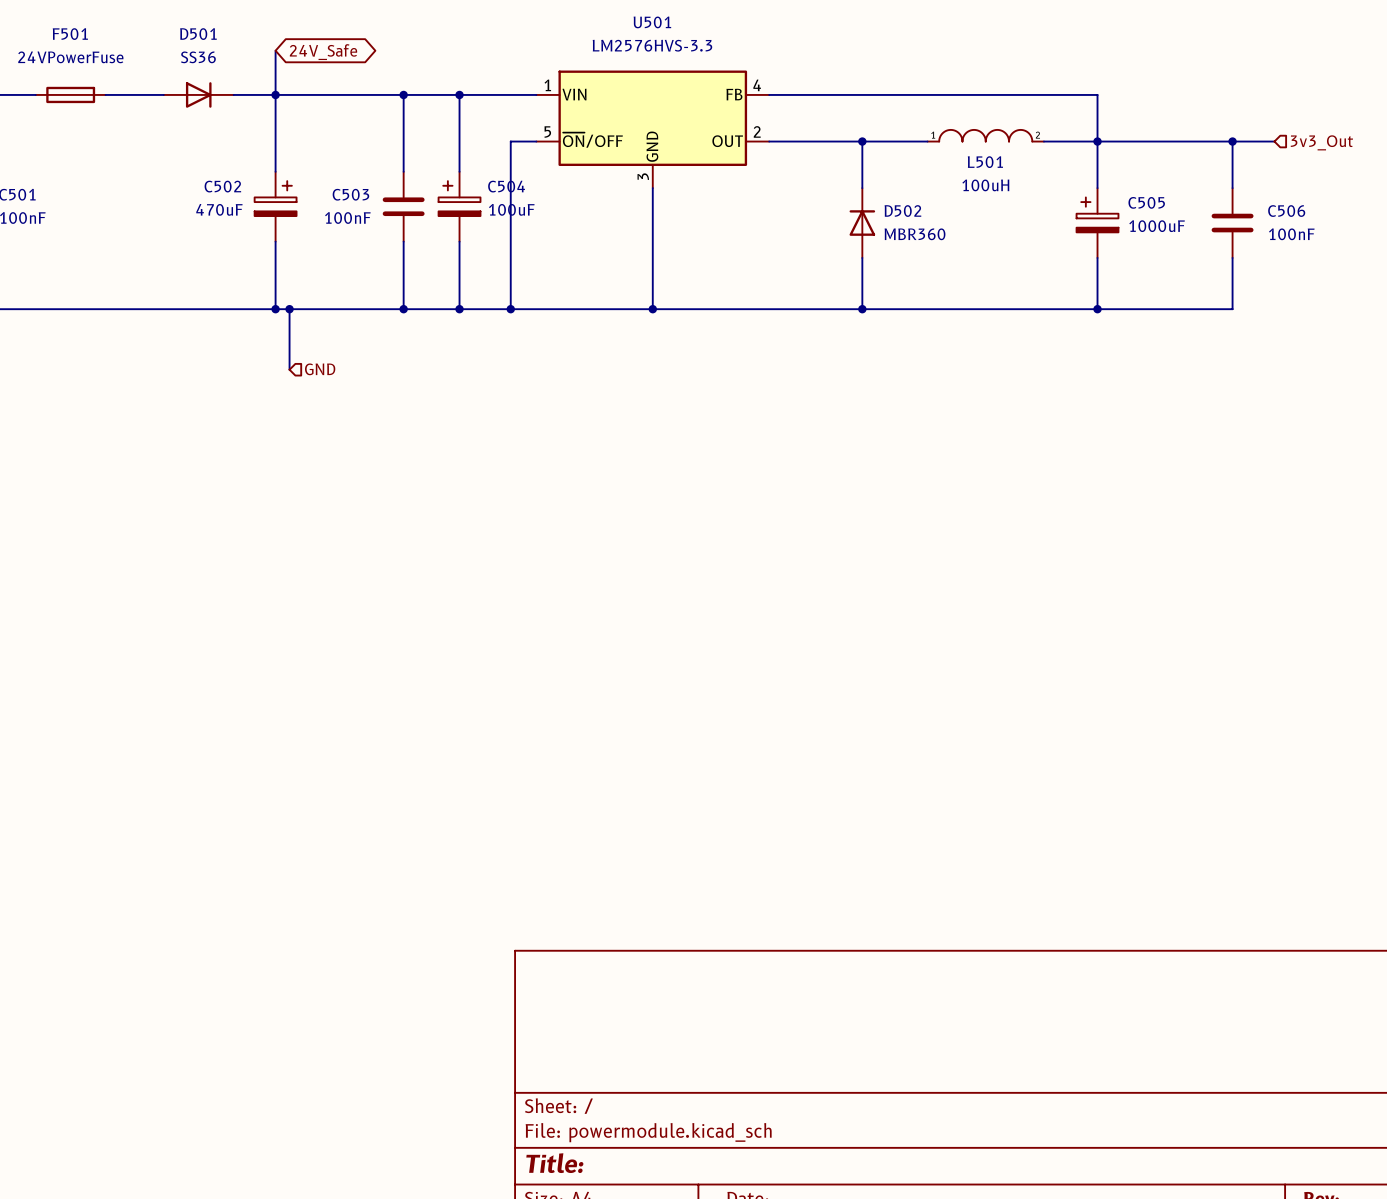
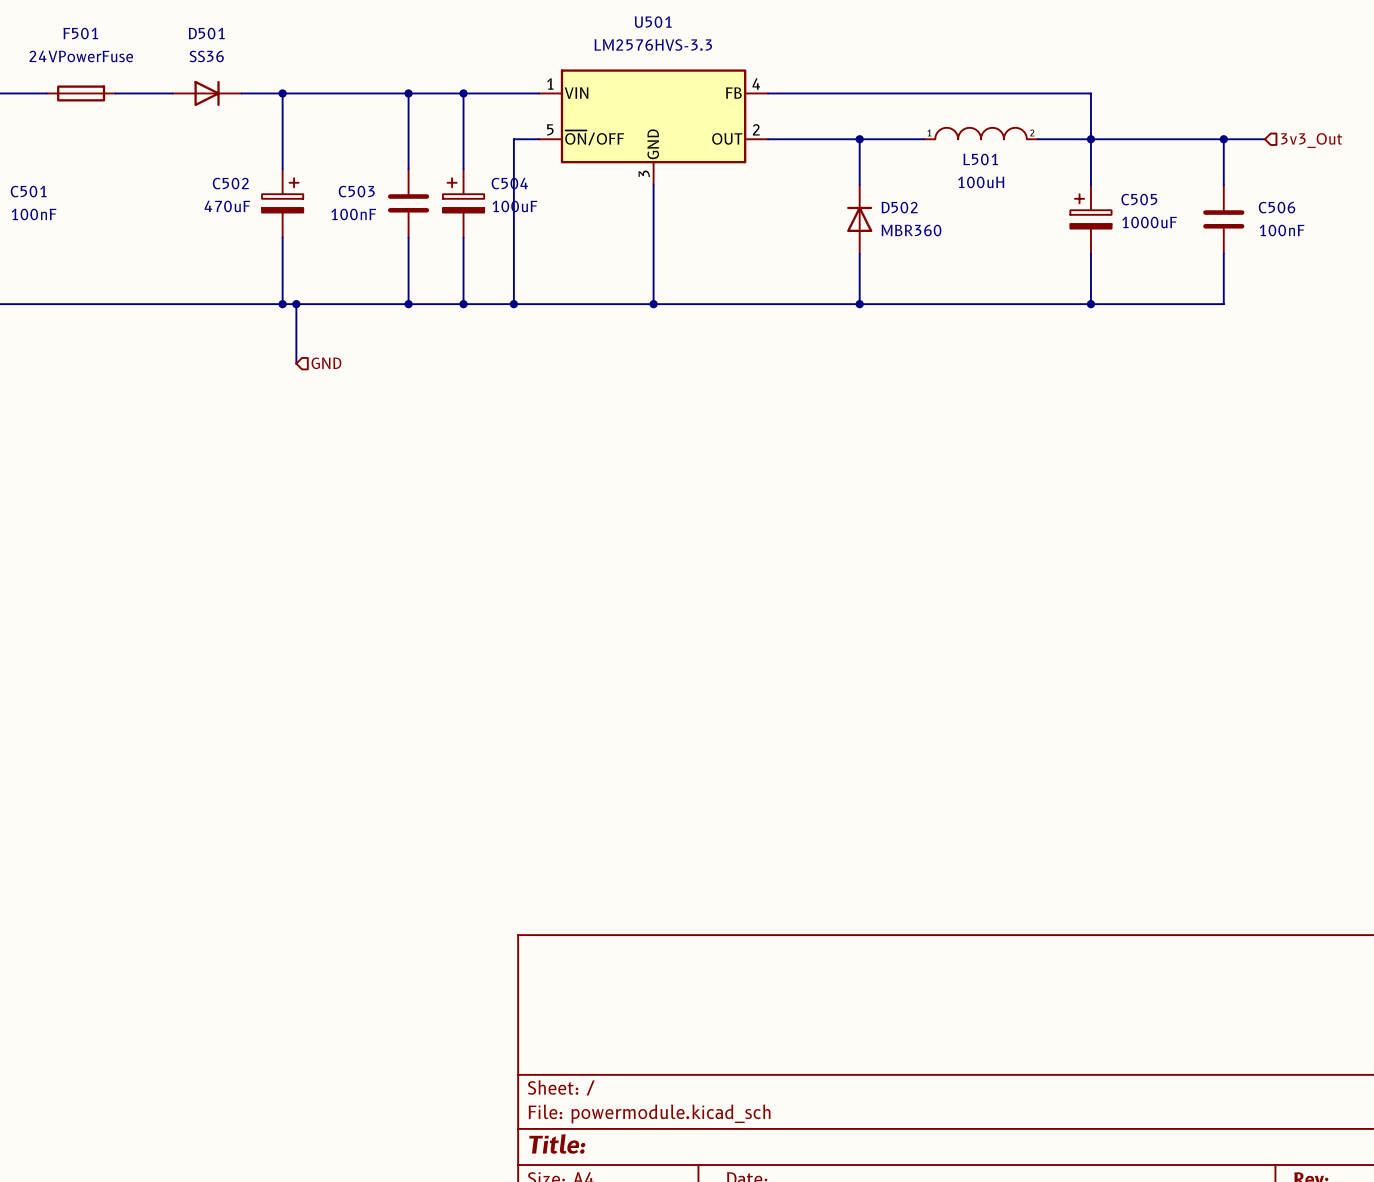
wire: (275, 50) (275, 94) -> none
global label: 24V_Safe (323, 52) -> none

